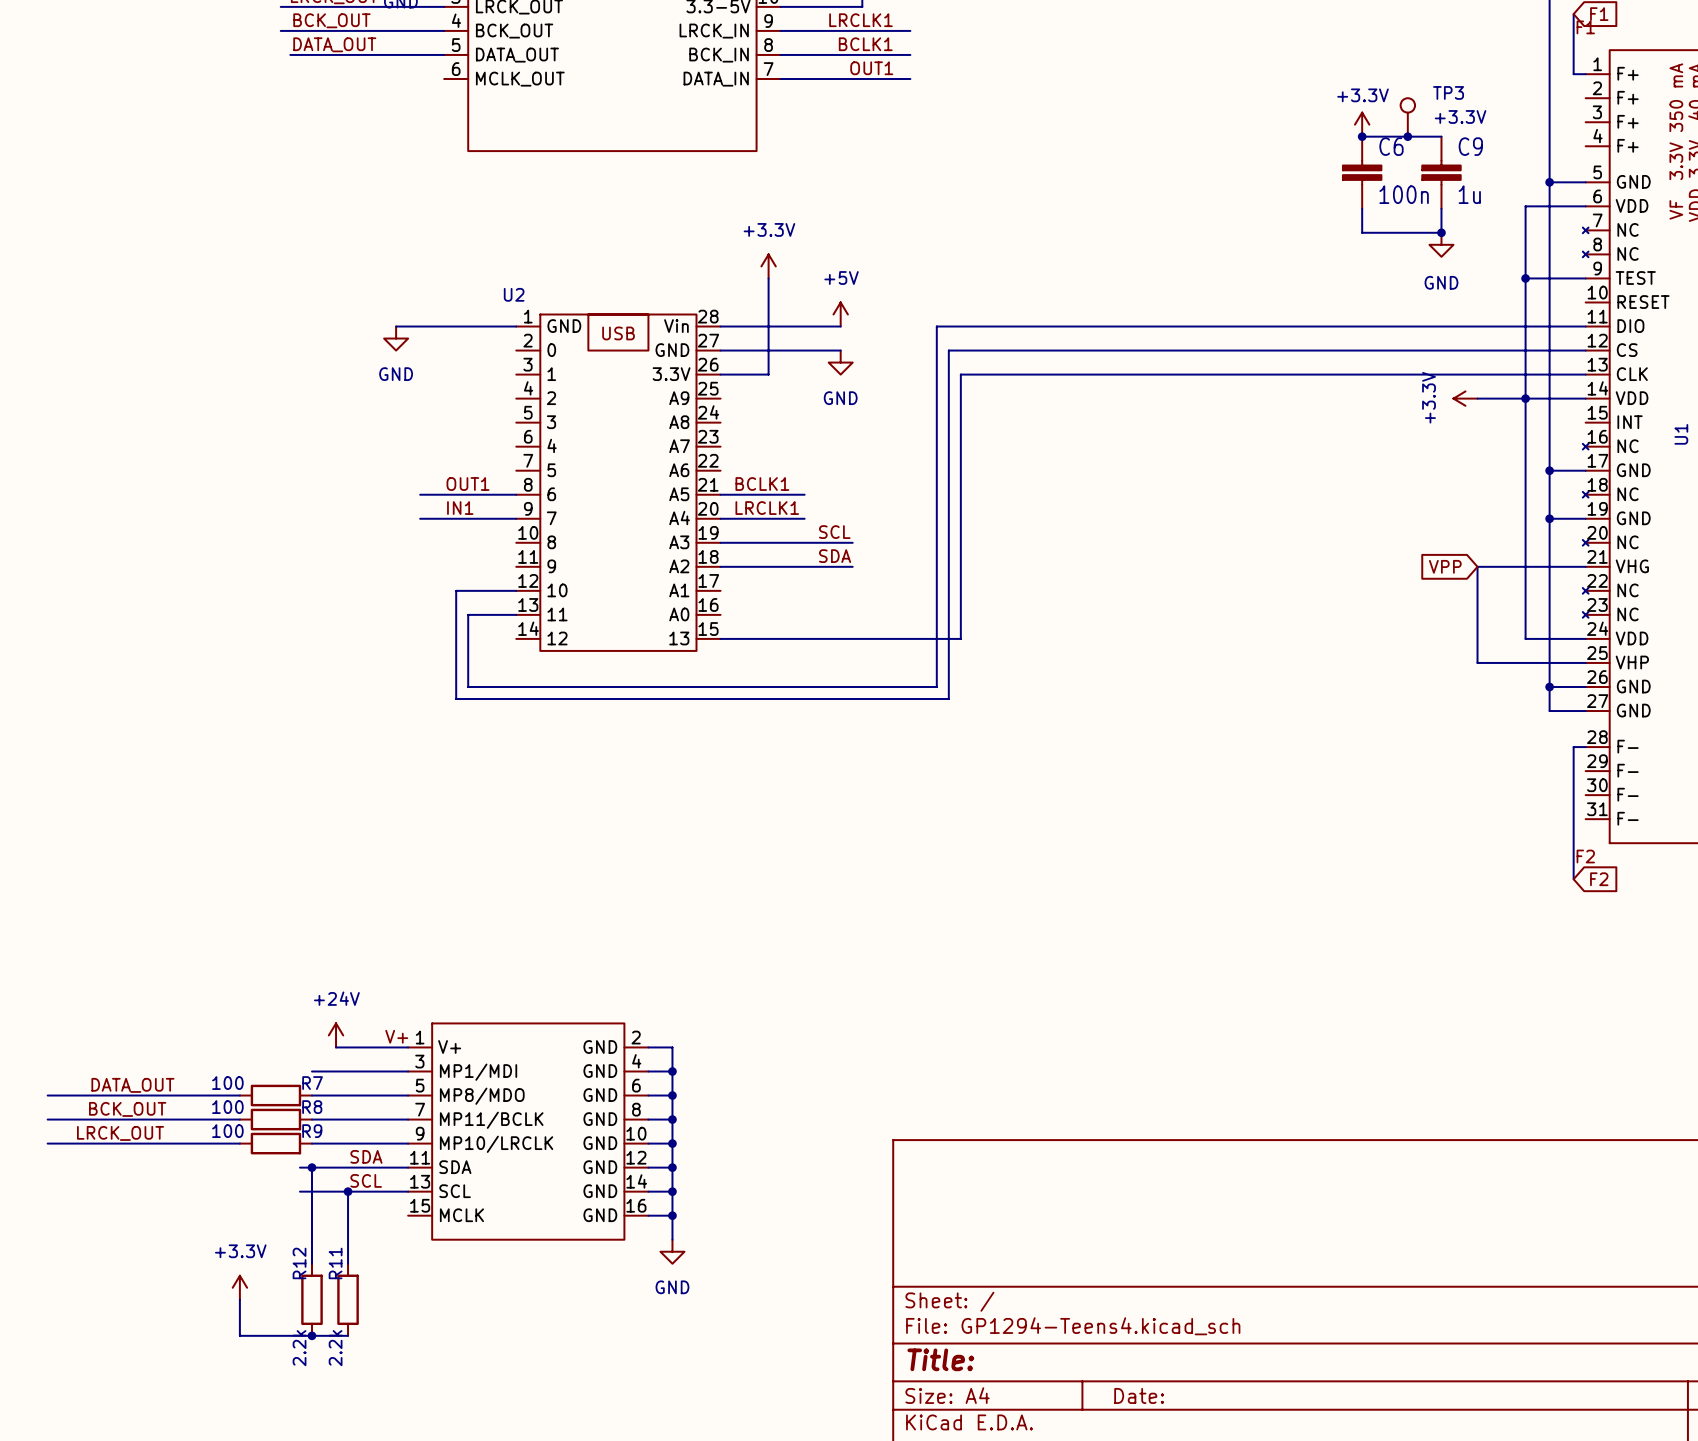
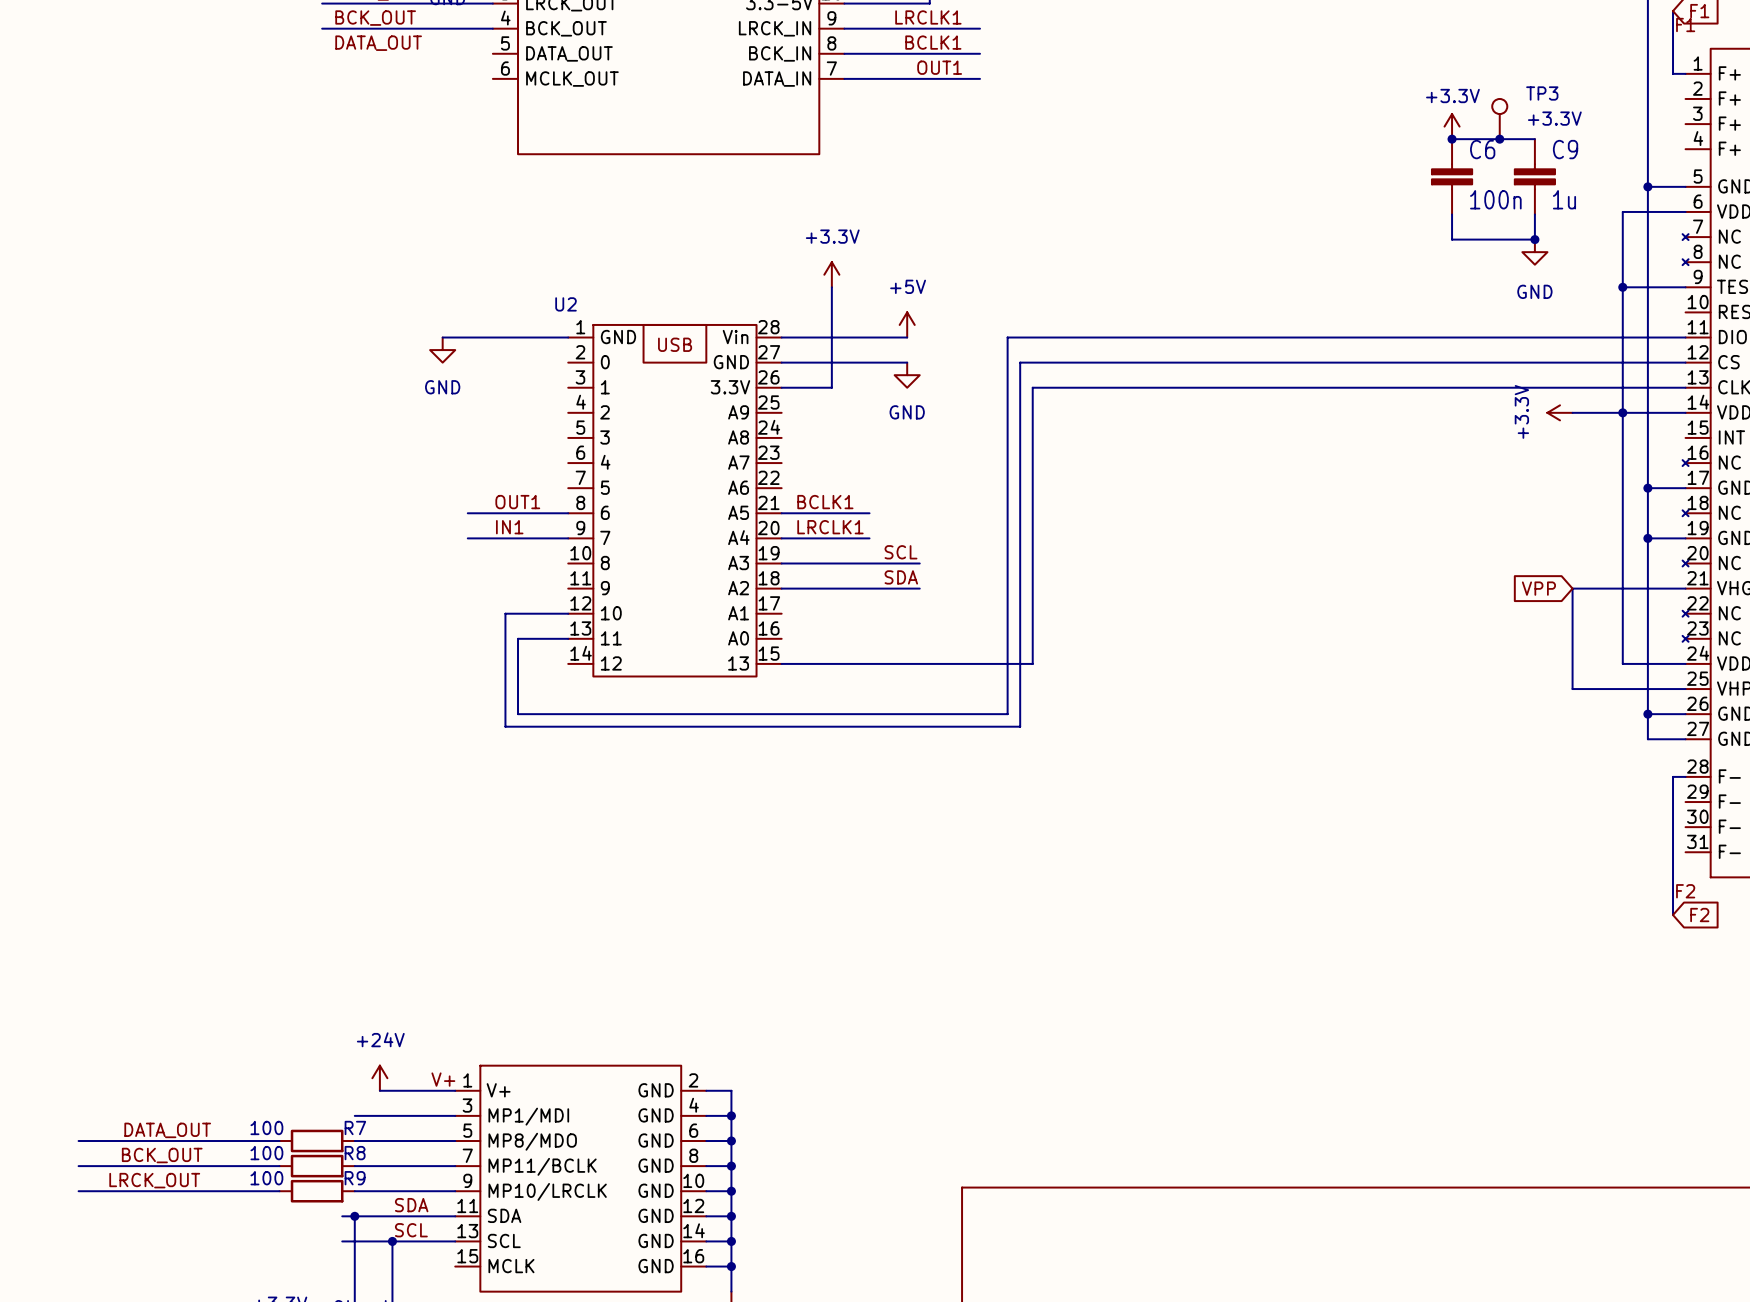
wire: (290, 54) (444, 54) -> none

